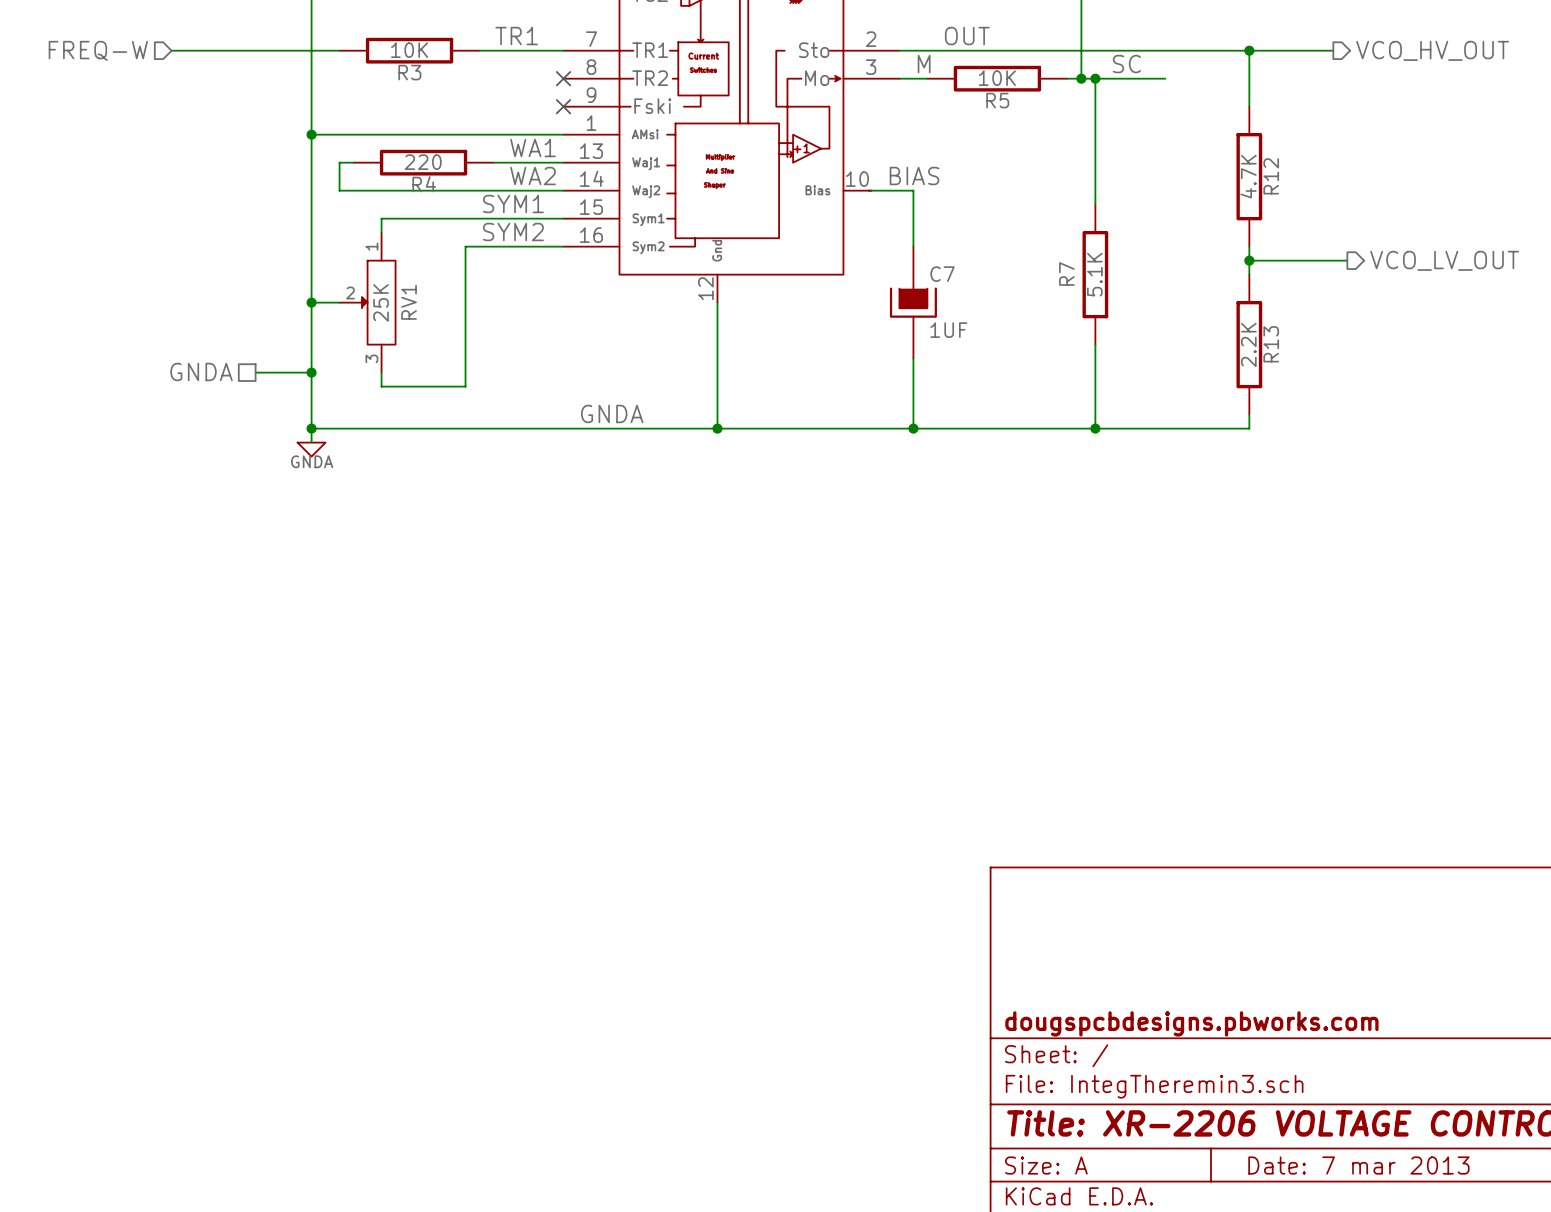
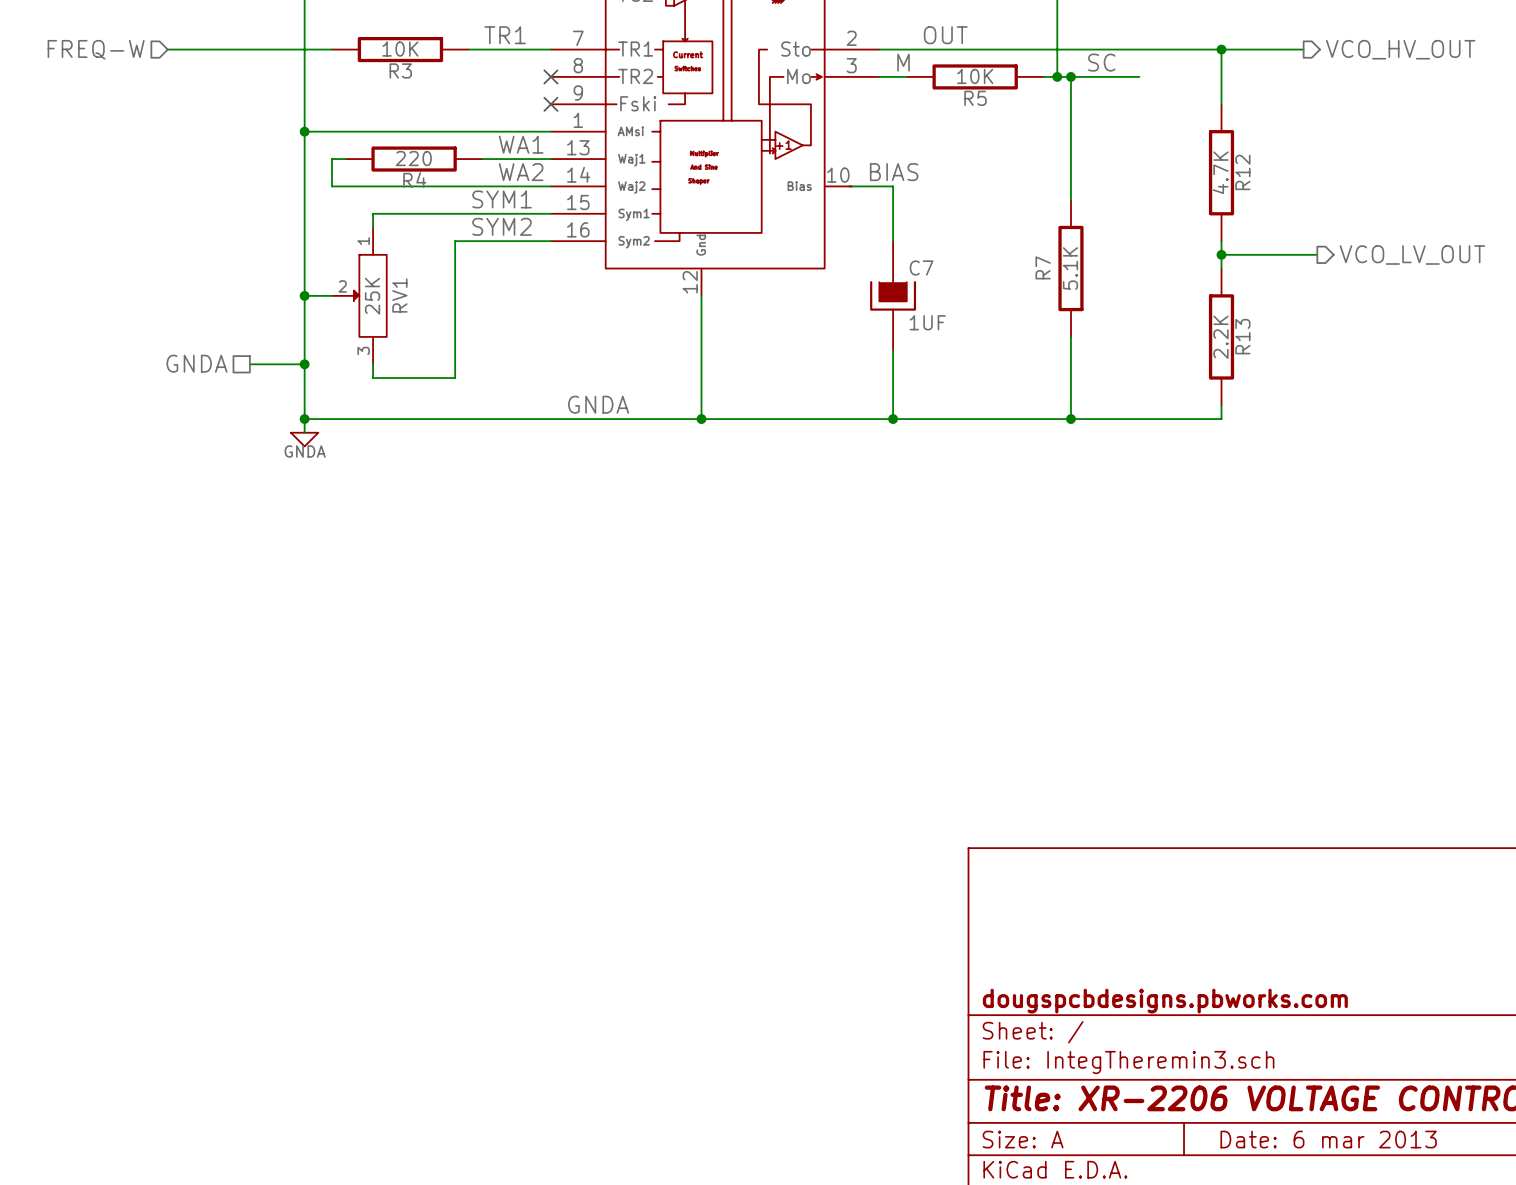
title block: Date: 7 mar 2013 (1358, 1165) -> Date: 6 mar 2013 (1328, 1139)

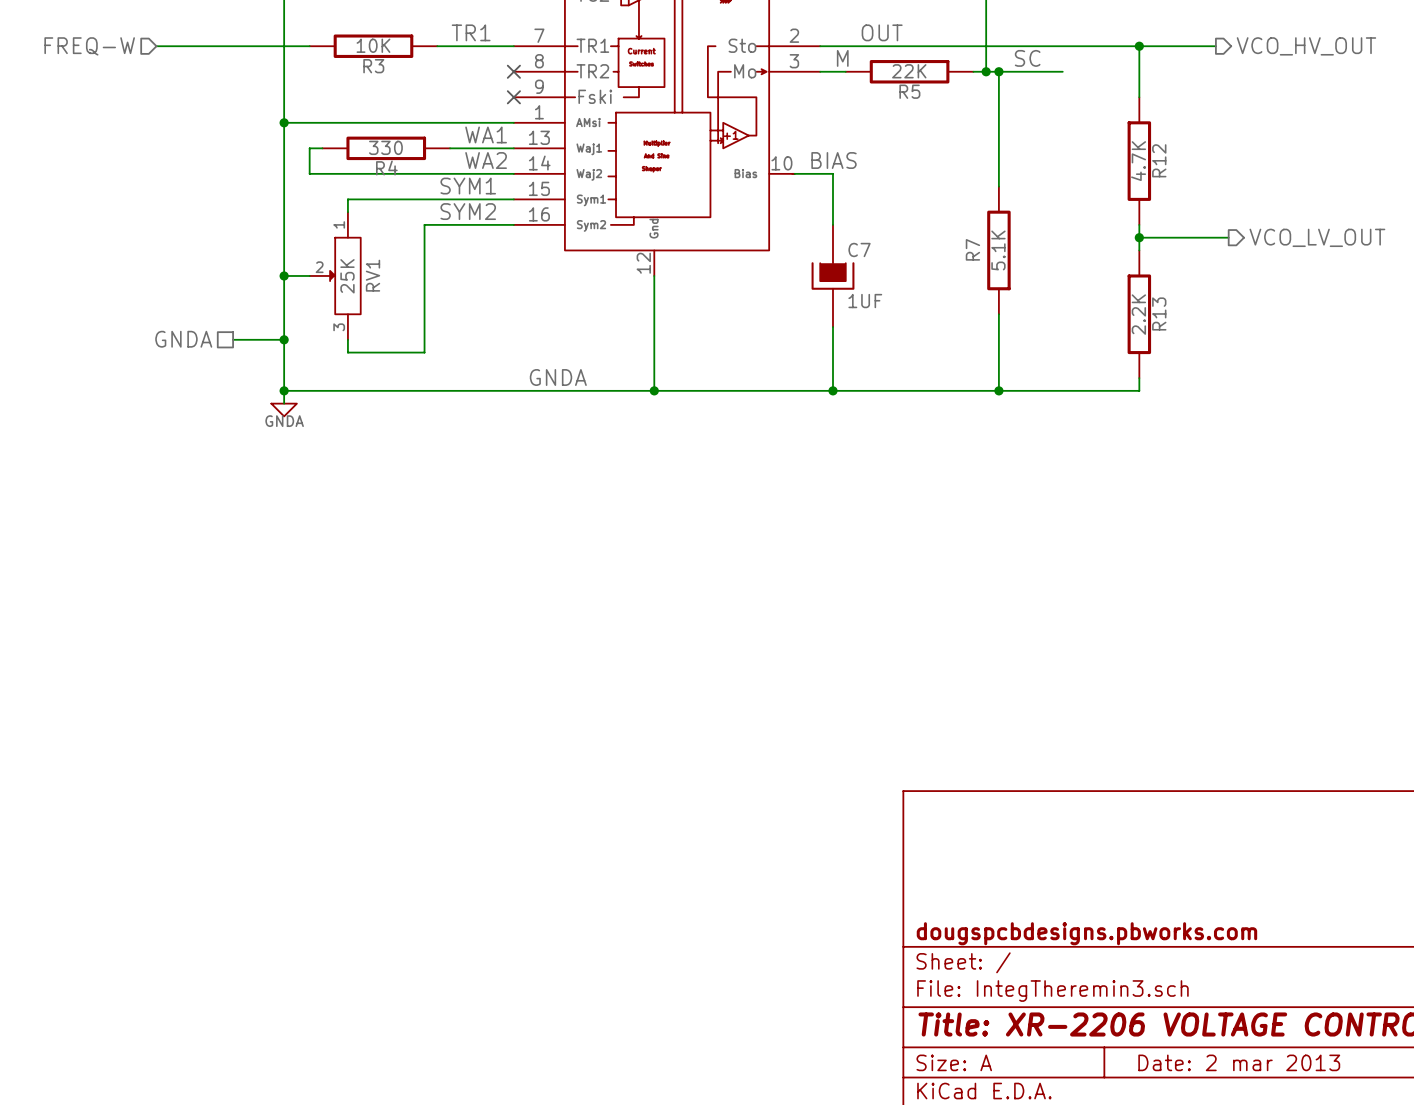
R5 value: 10K (975, 76) -> 22K (909, 71)
R4 value: 220 (413, 158) -> 330 (385, 147)
title block: Date: 6 mar 2013 (1328, 1139) -> Date: 2 mar 2013 (1239, 1062)

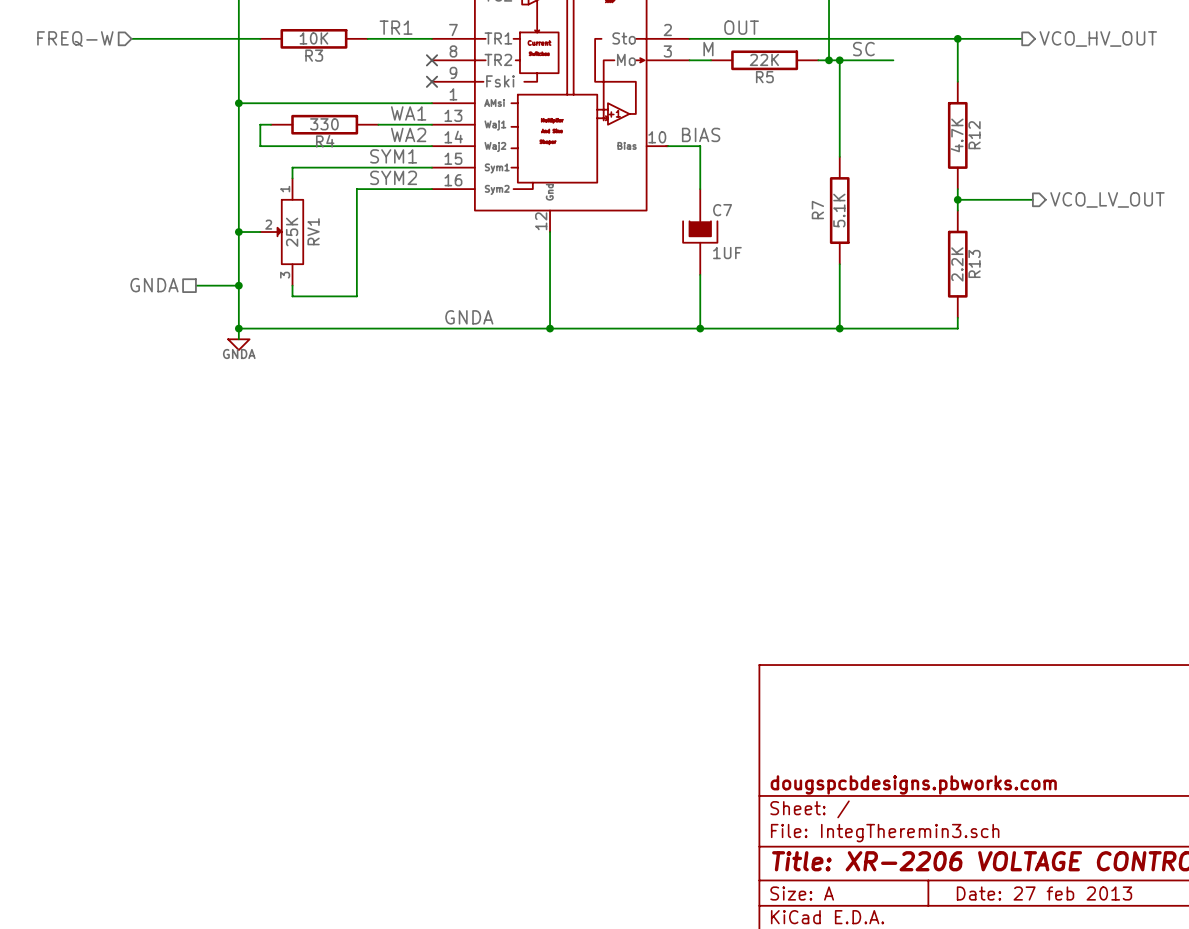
title block: Date: 2 mar 2013 (1239, 1062) -> Date: 27 feb 2013 (1044, 893)

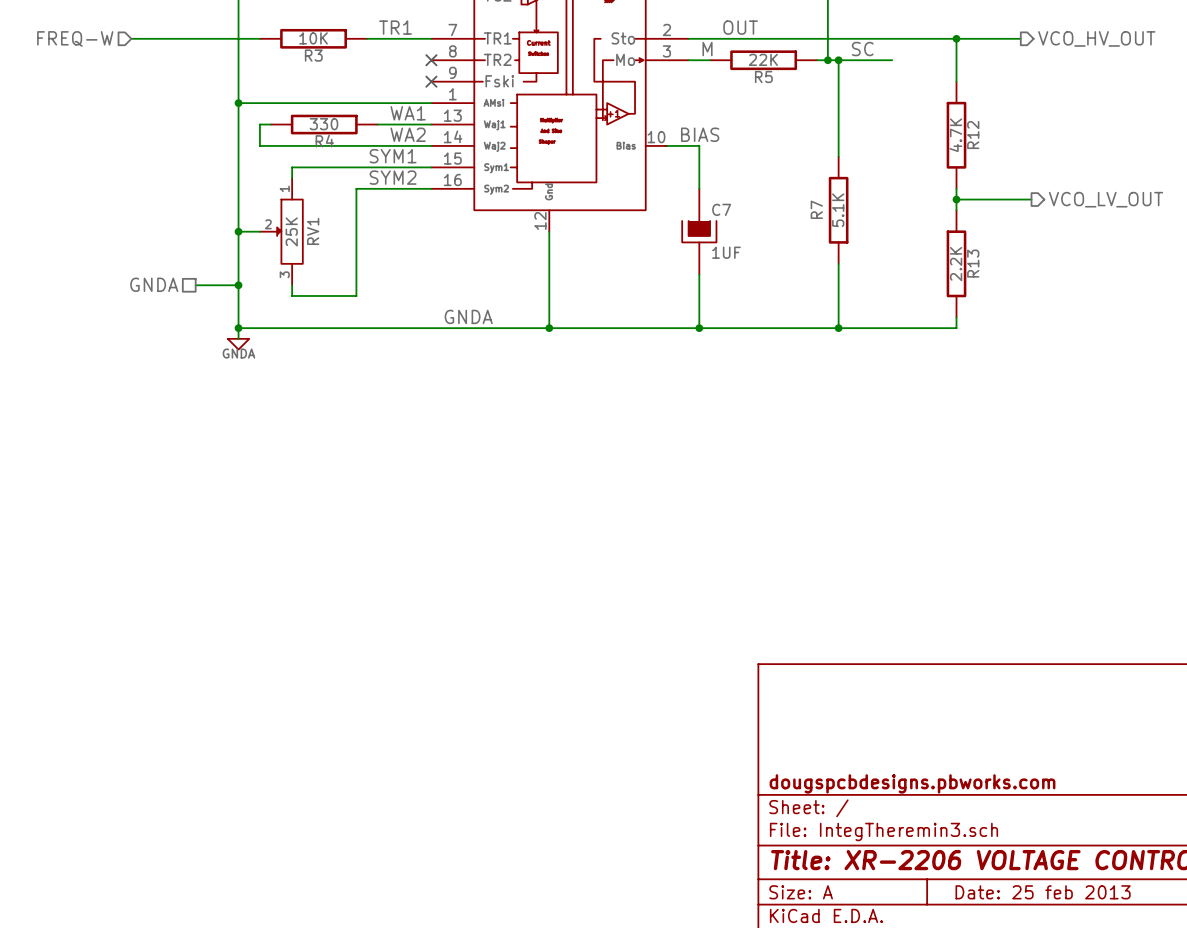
title block: Date: 27 feb 2013 (1044, 893) -> Date: 25 feb 2013 (1043, 892)

